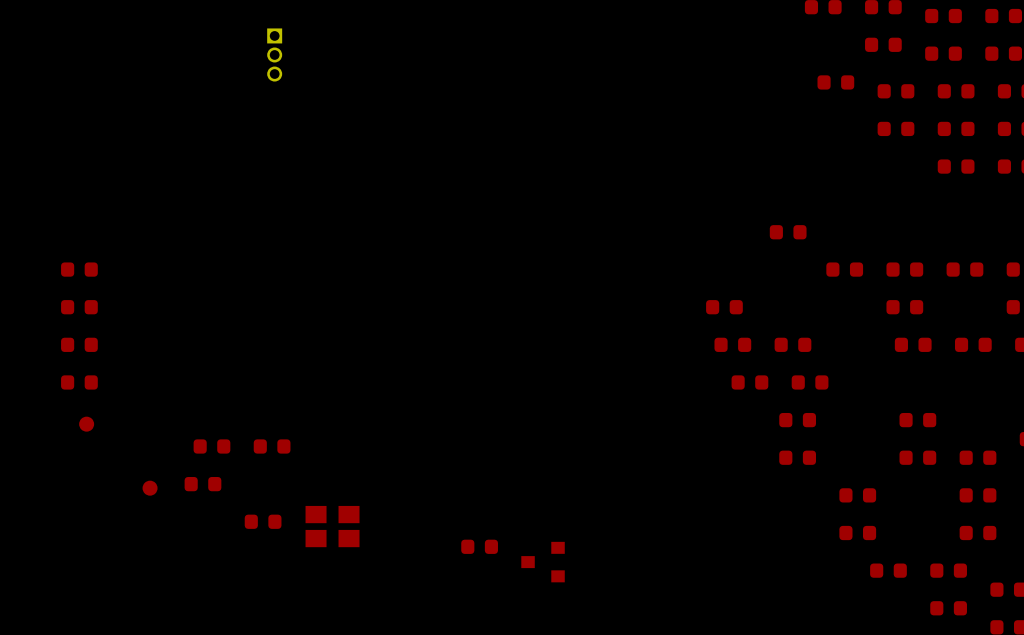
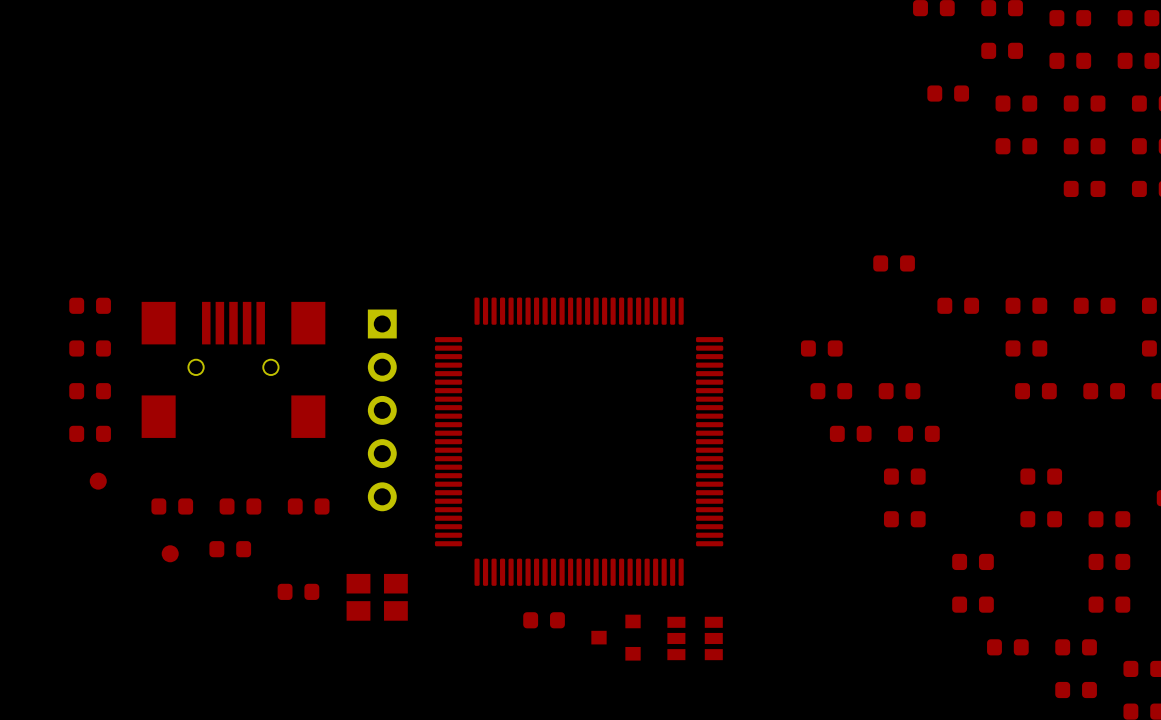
part: (274, 54) -> none
part: none -> (233, 369)
part: none -> (382, 410)
part: none -> (579, 441)
part: none -> (172, 506)
part: none -> (695, 638)

